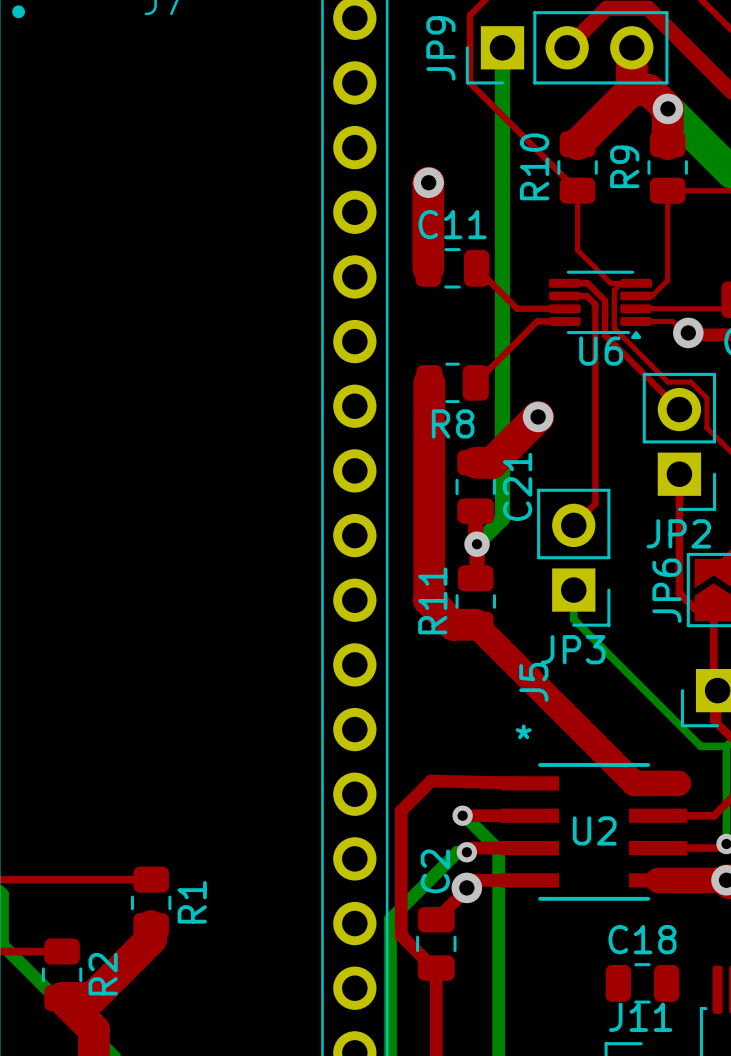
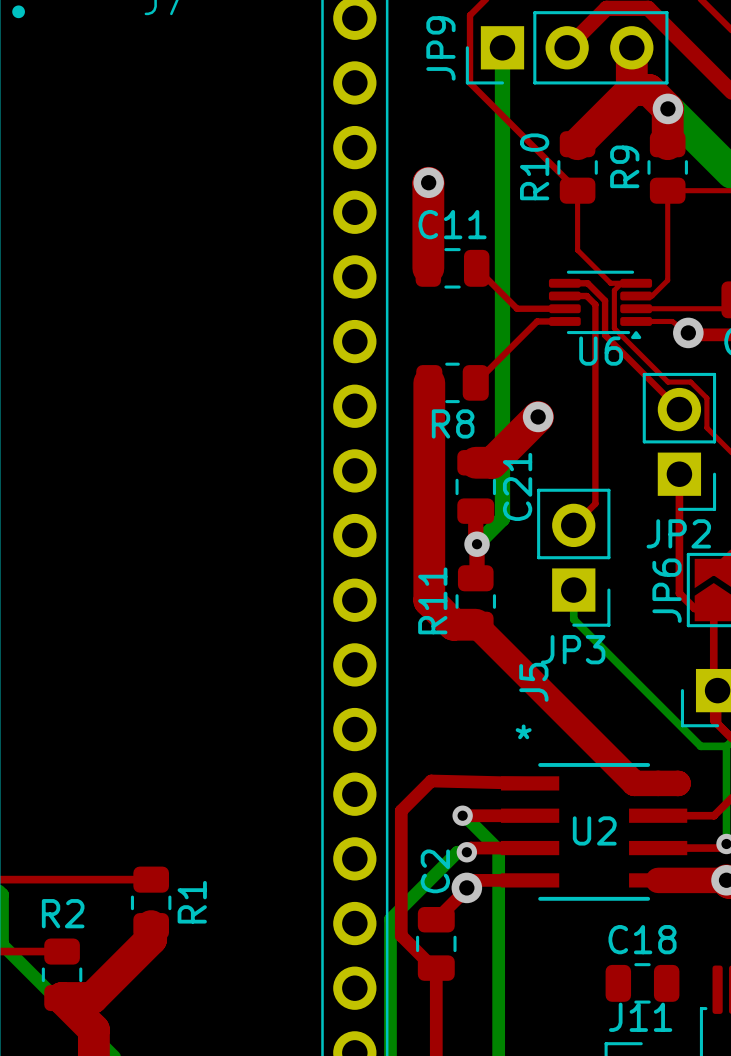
R2 name rotation: 0° (103, 974) -> 90° clockwise (63, 913)
R2 name position: R2 (103, 974) -> R2 (63, 913)

